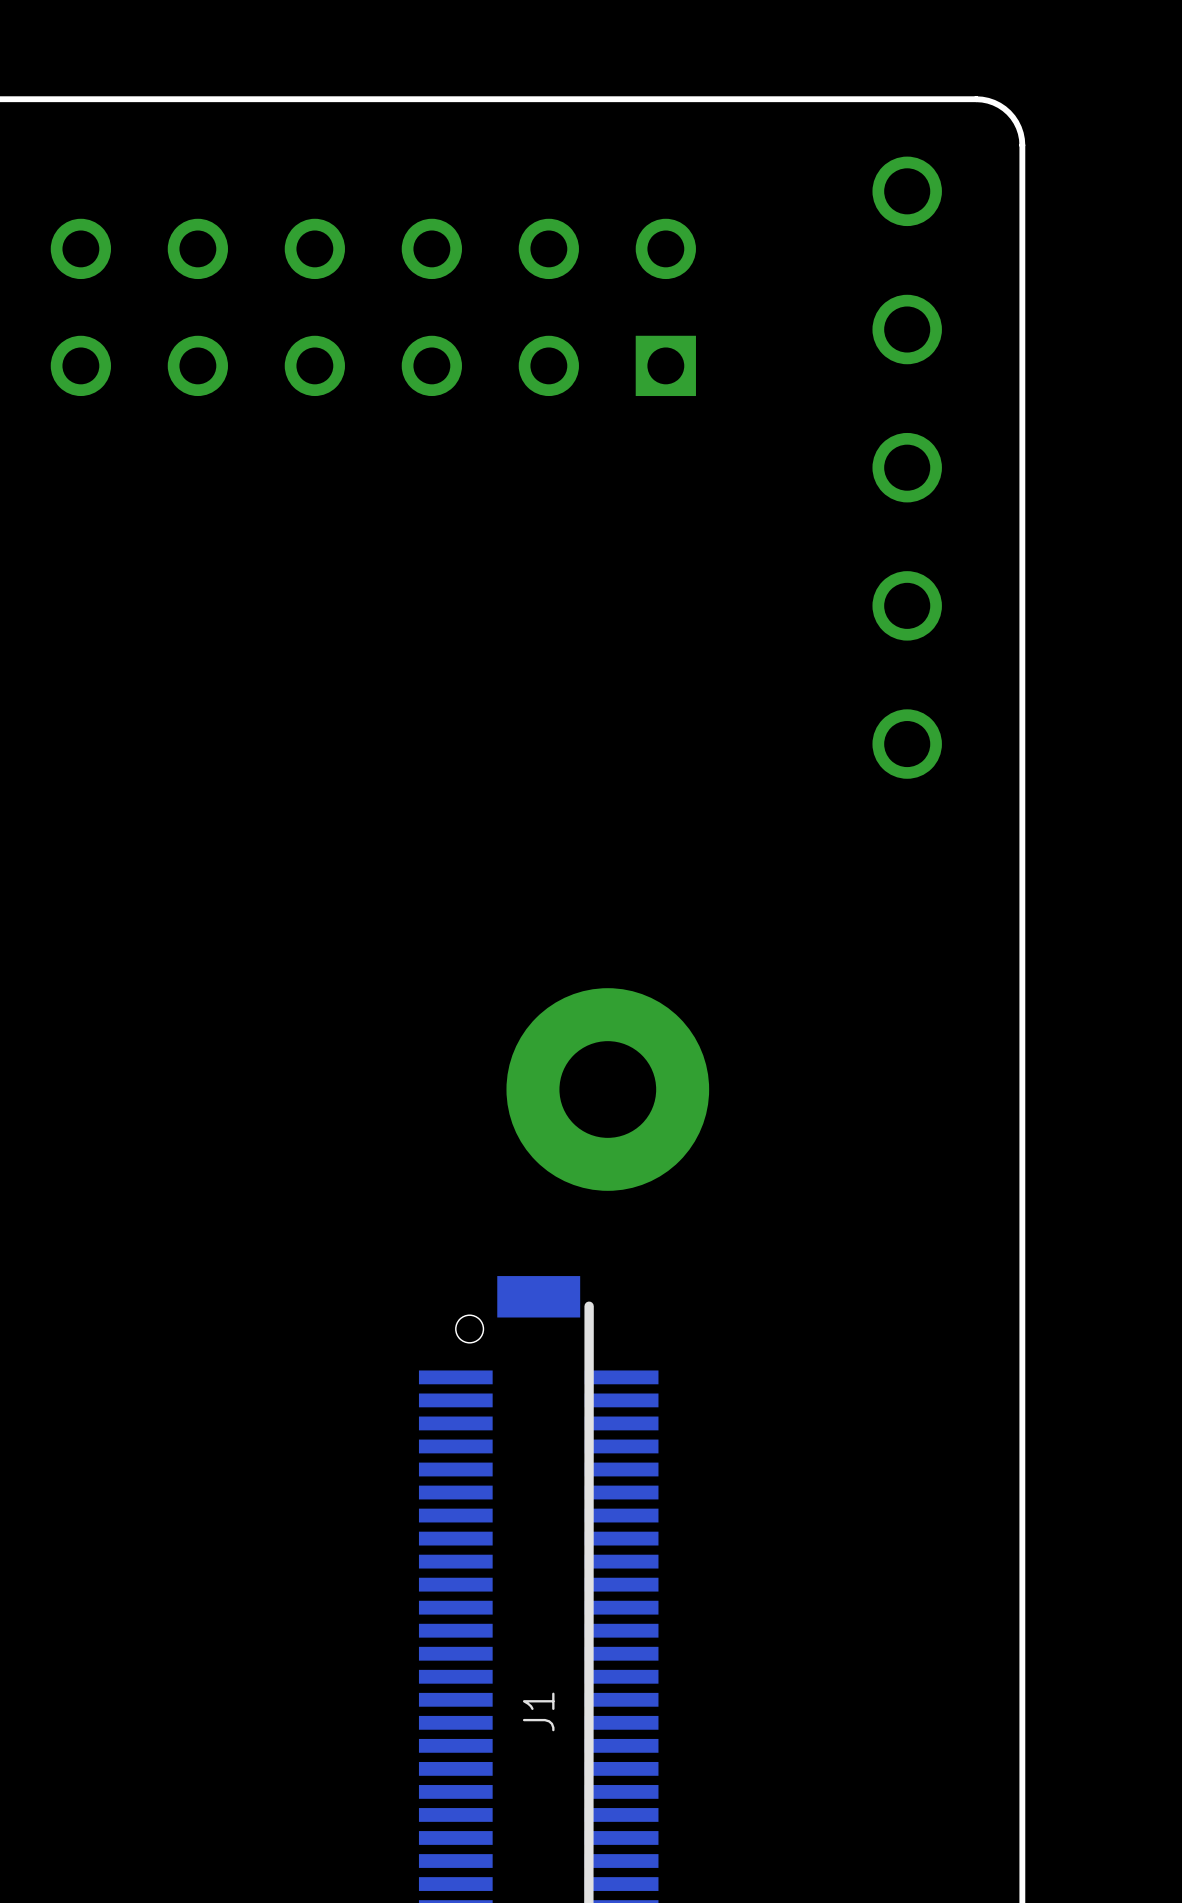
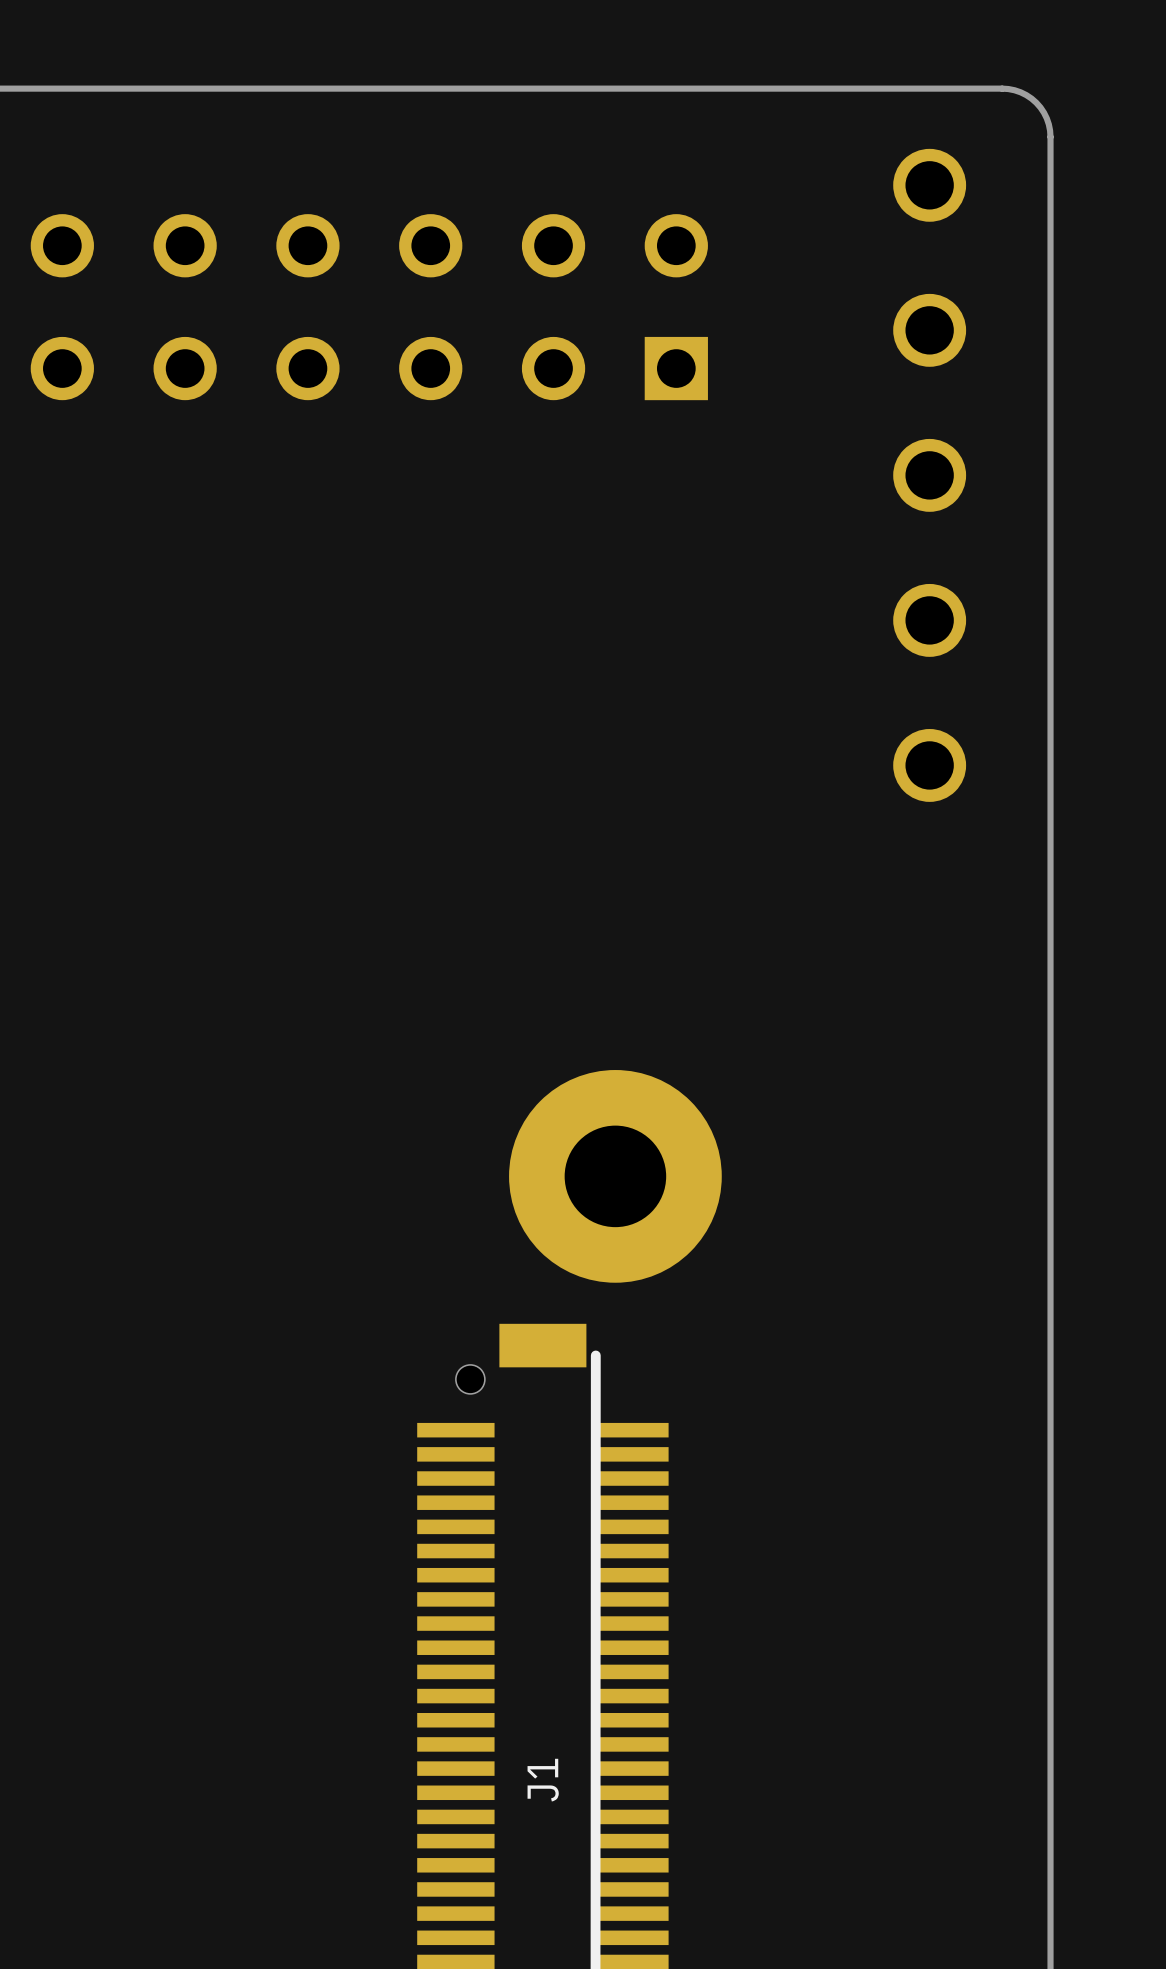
part position: (607, 1089) -> (615, 1176)

